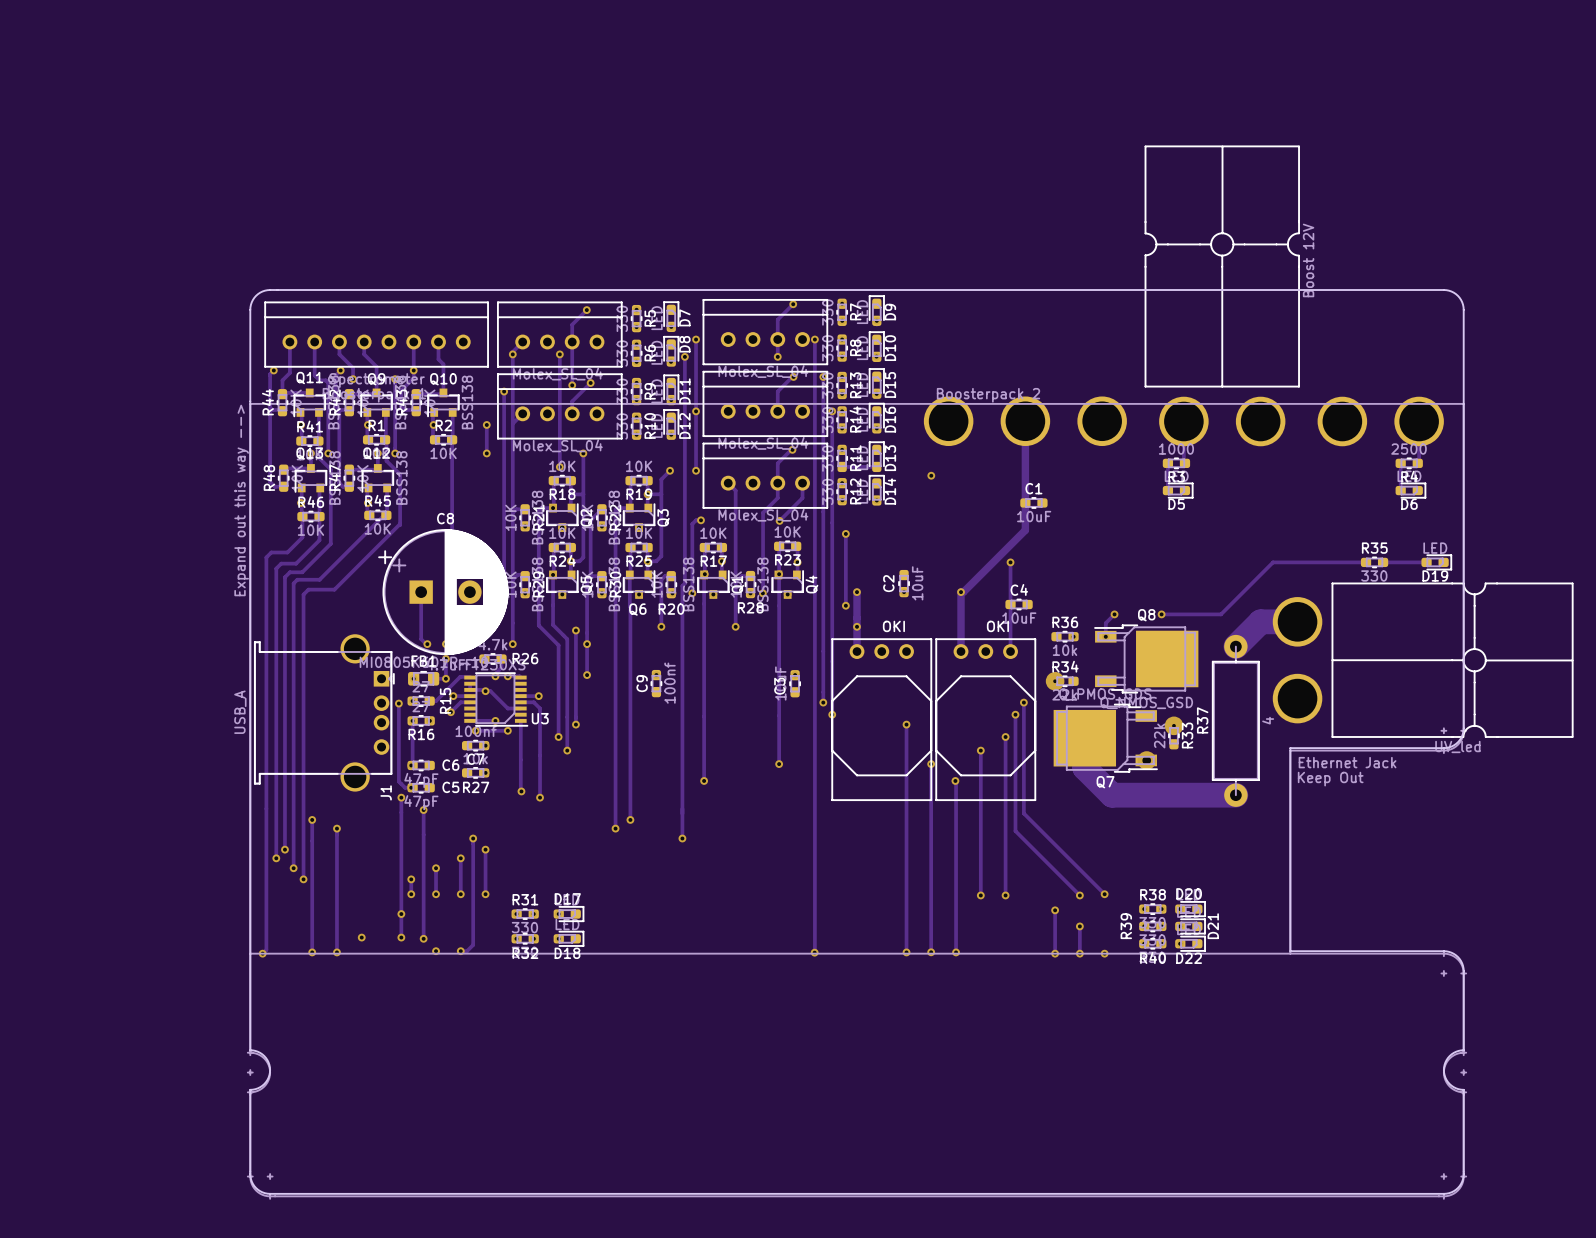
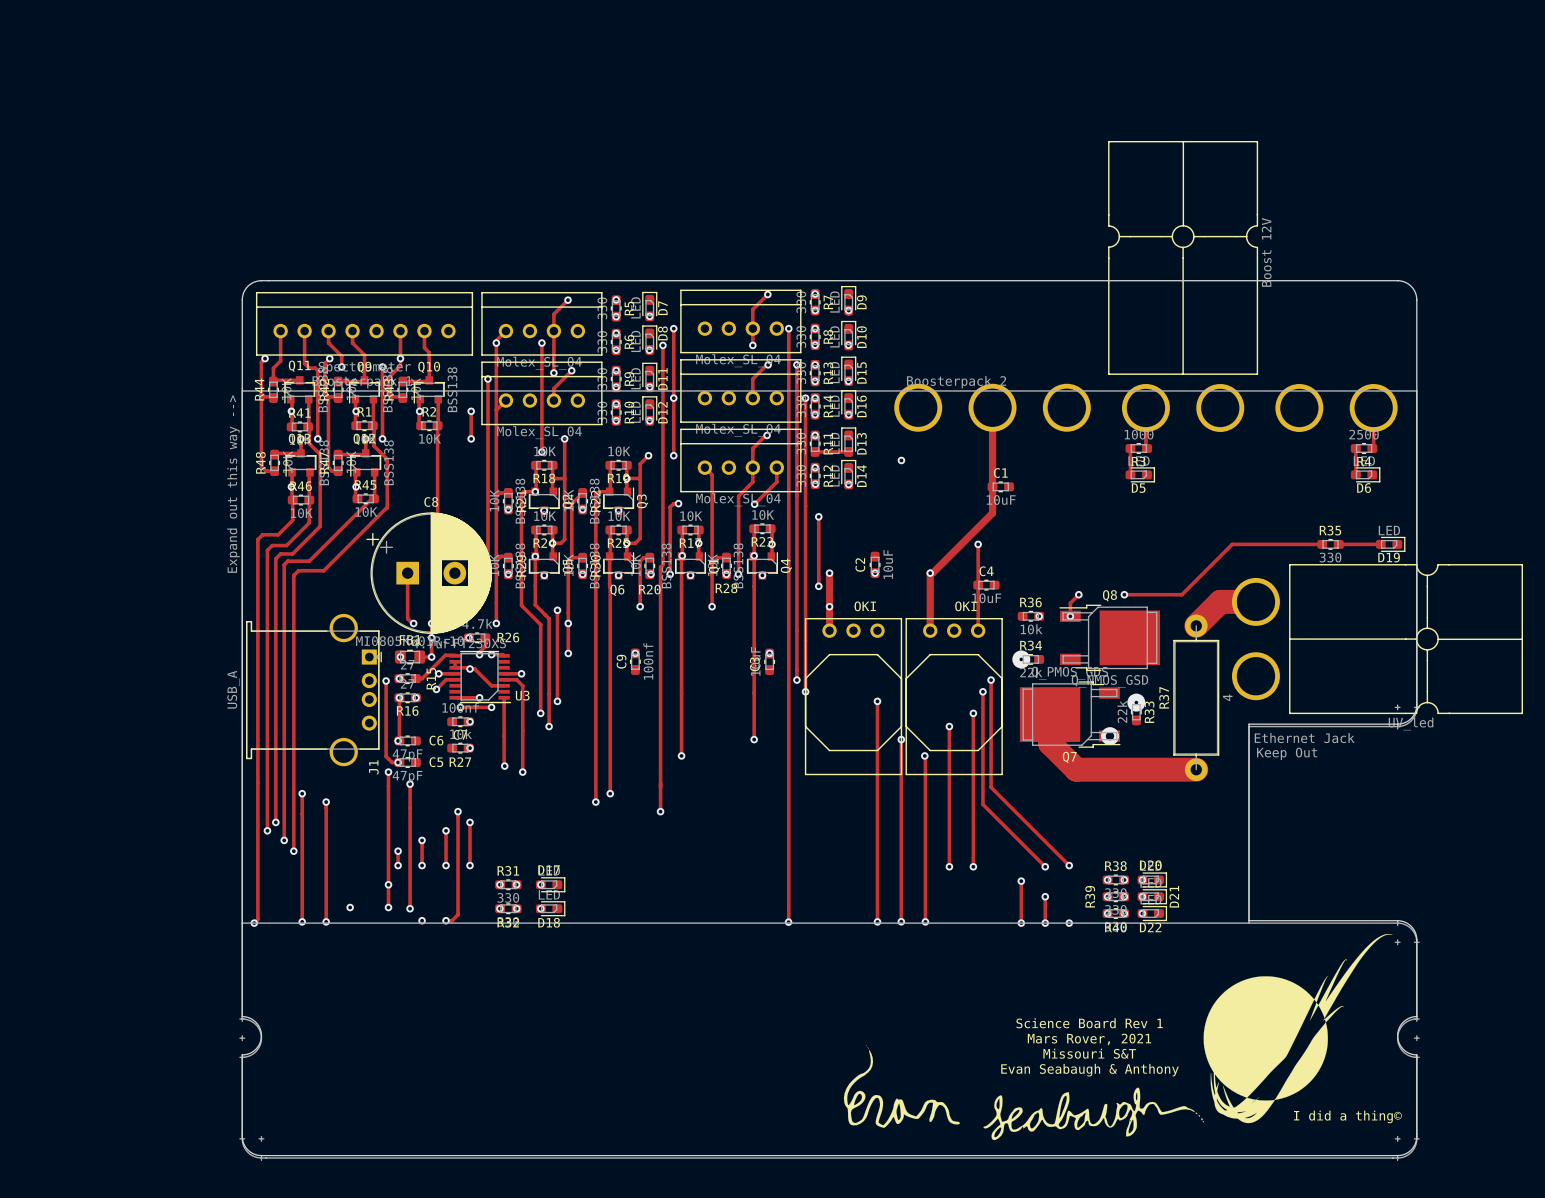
drawing: none -> [843, 934, 1393, 1141]
text: none -> Science Board Rev 1 (1089, 1023)
text: none -> Mars Rover, 2021 (1089, 1039)
text: none -> Missouri S&T (1089, 1053)
text: none -> Evan Seabaugh & Anthony (1089, 1070)
text: none -> I did a thing© (1347, 1116)

